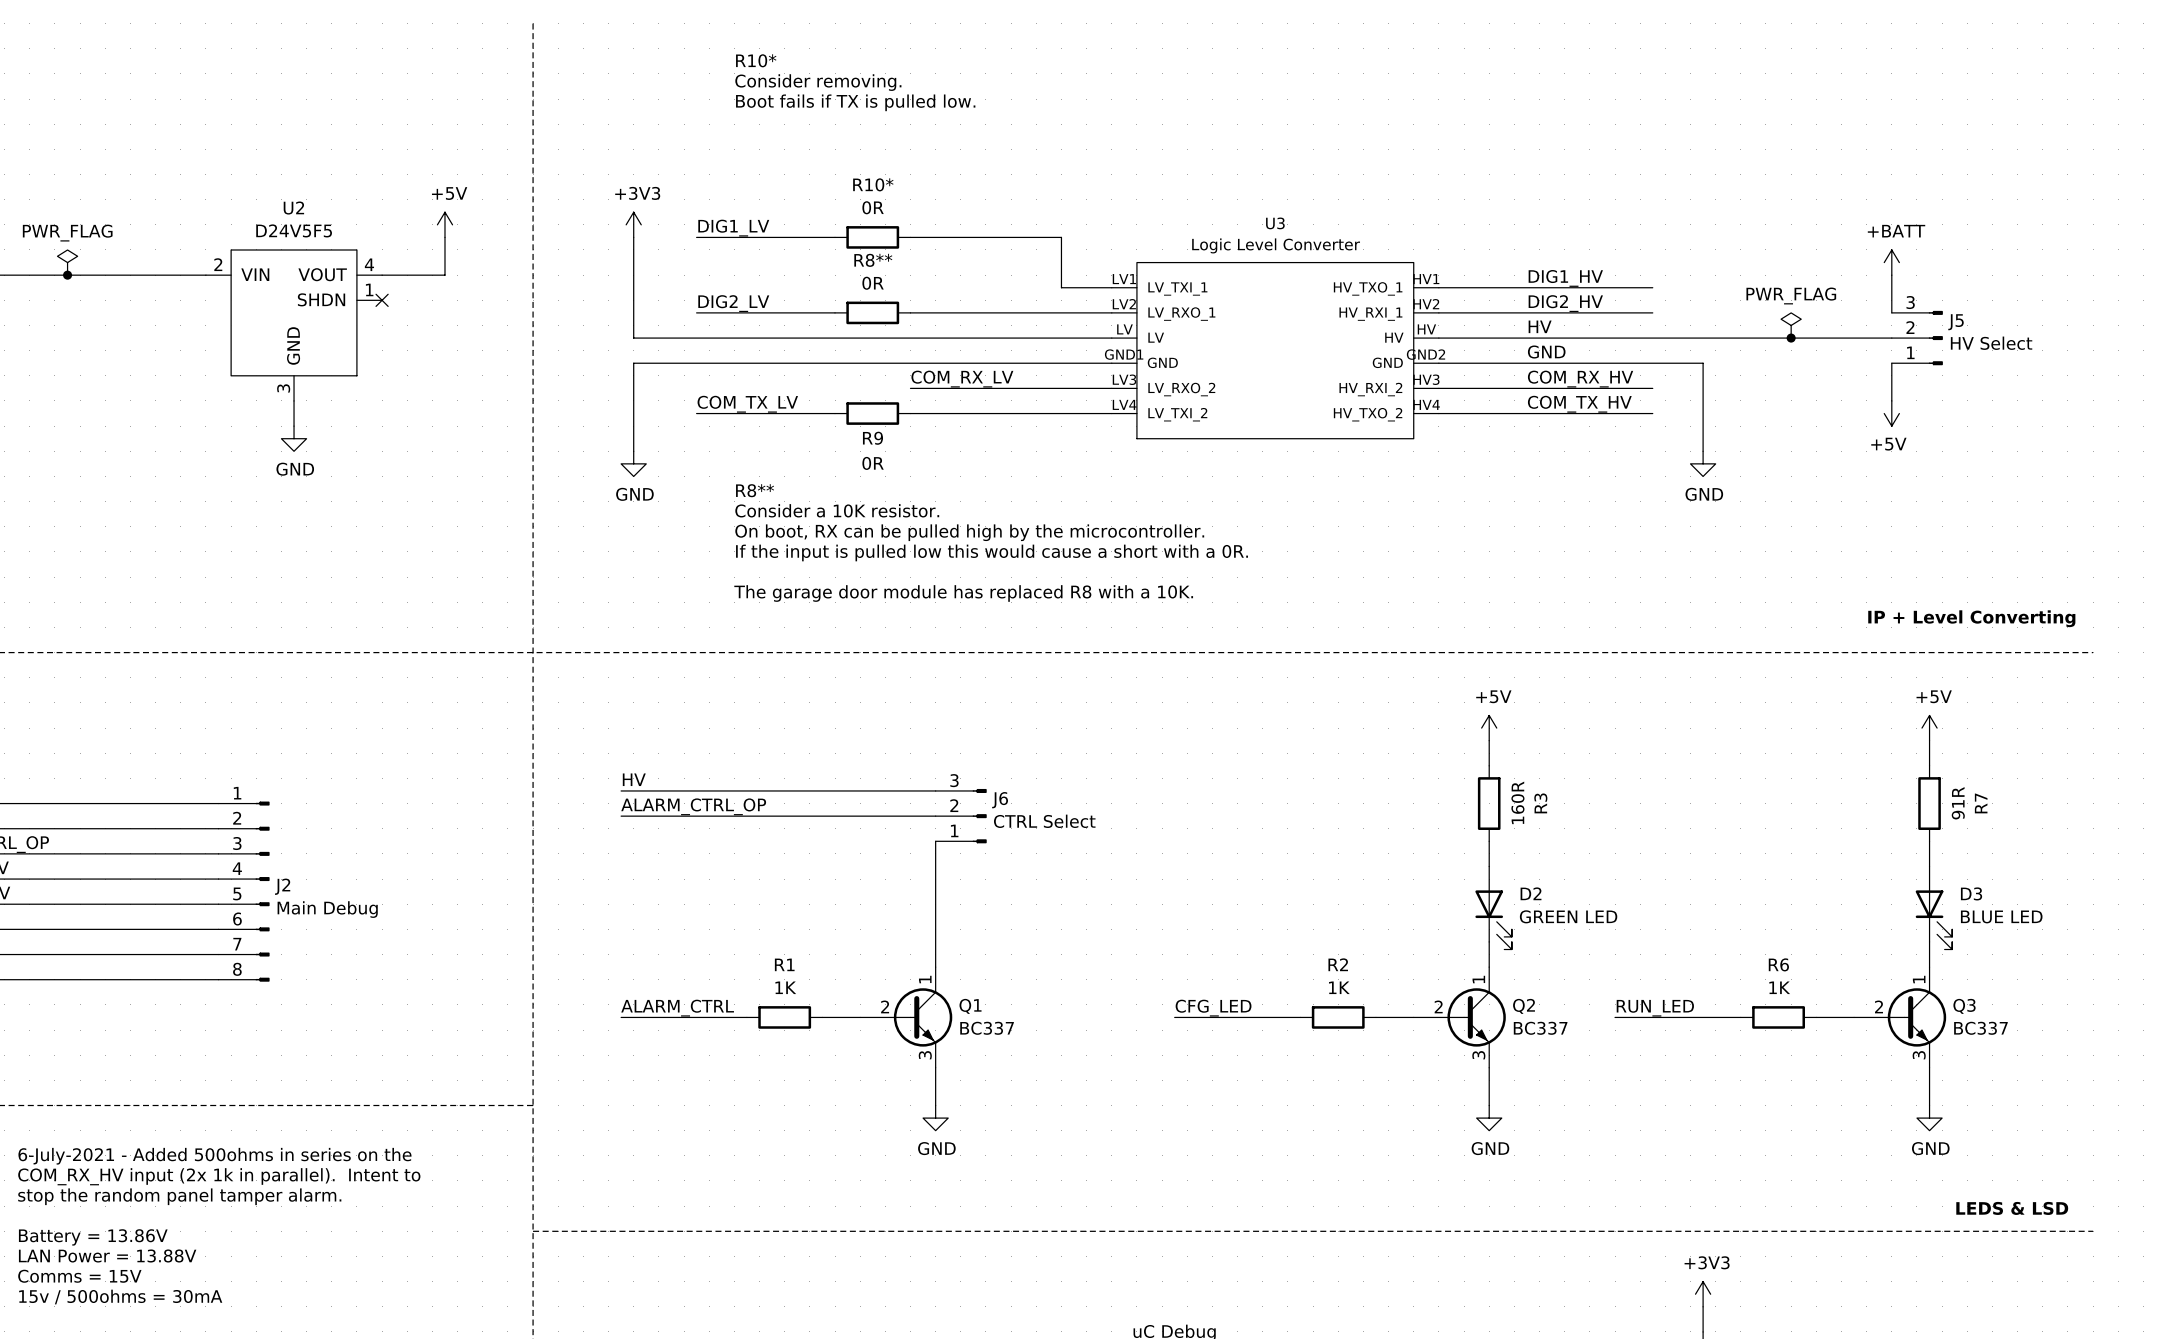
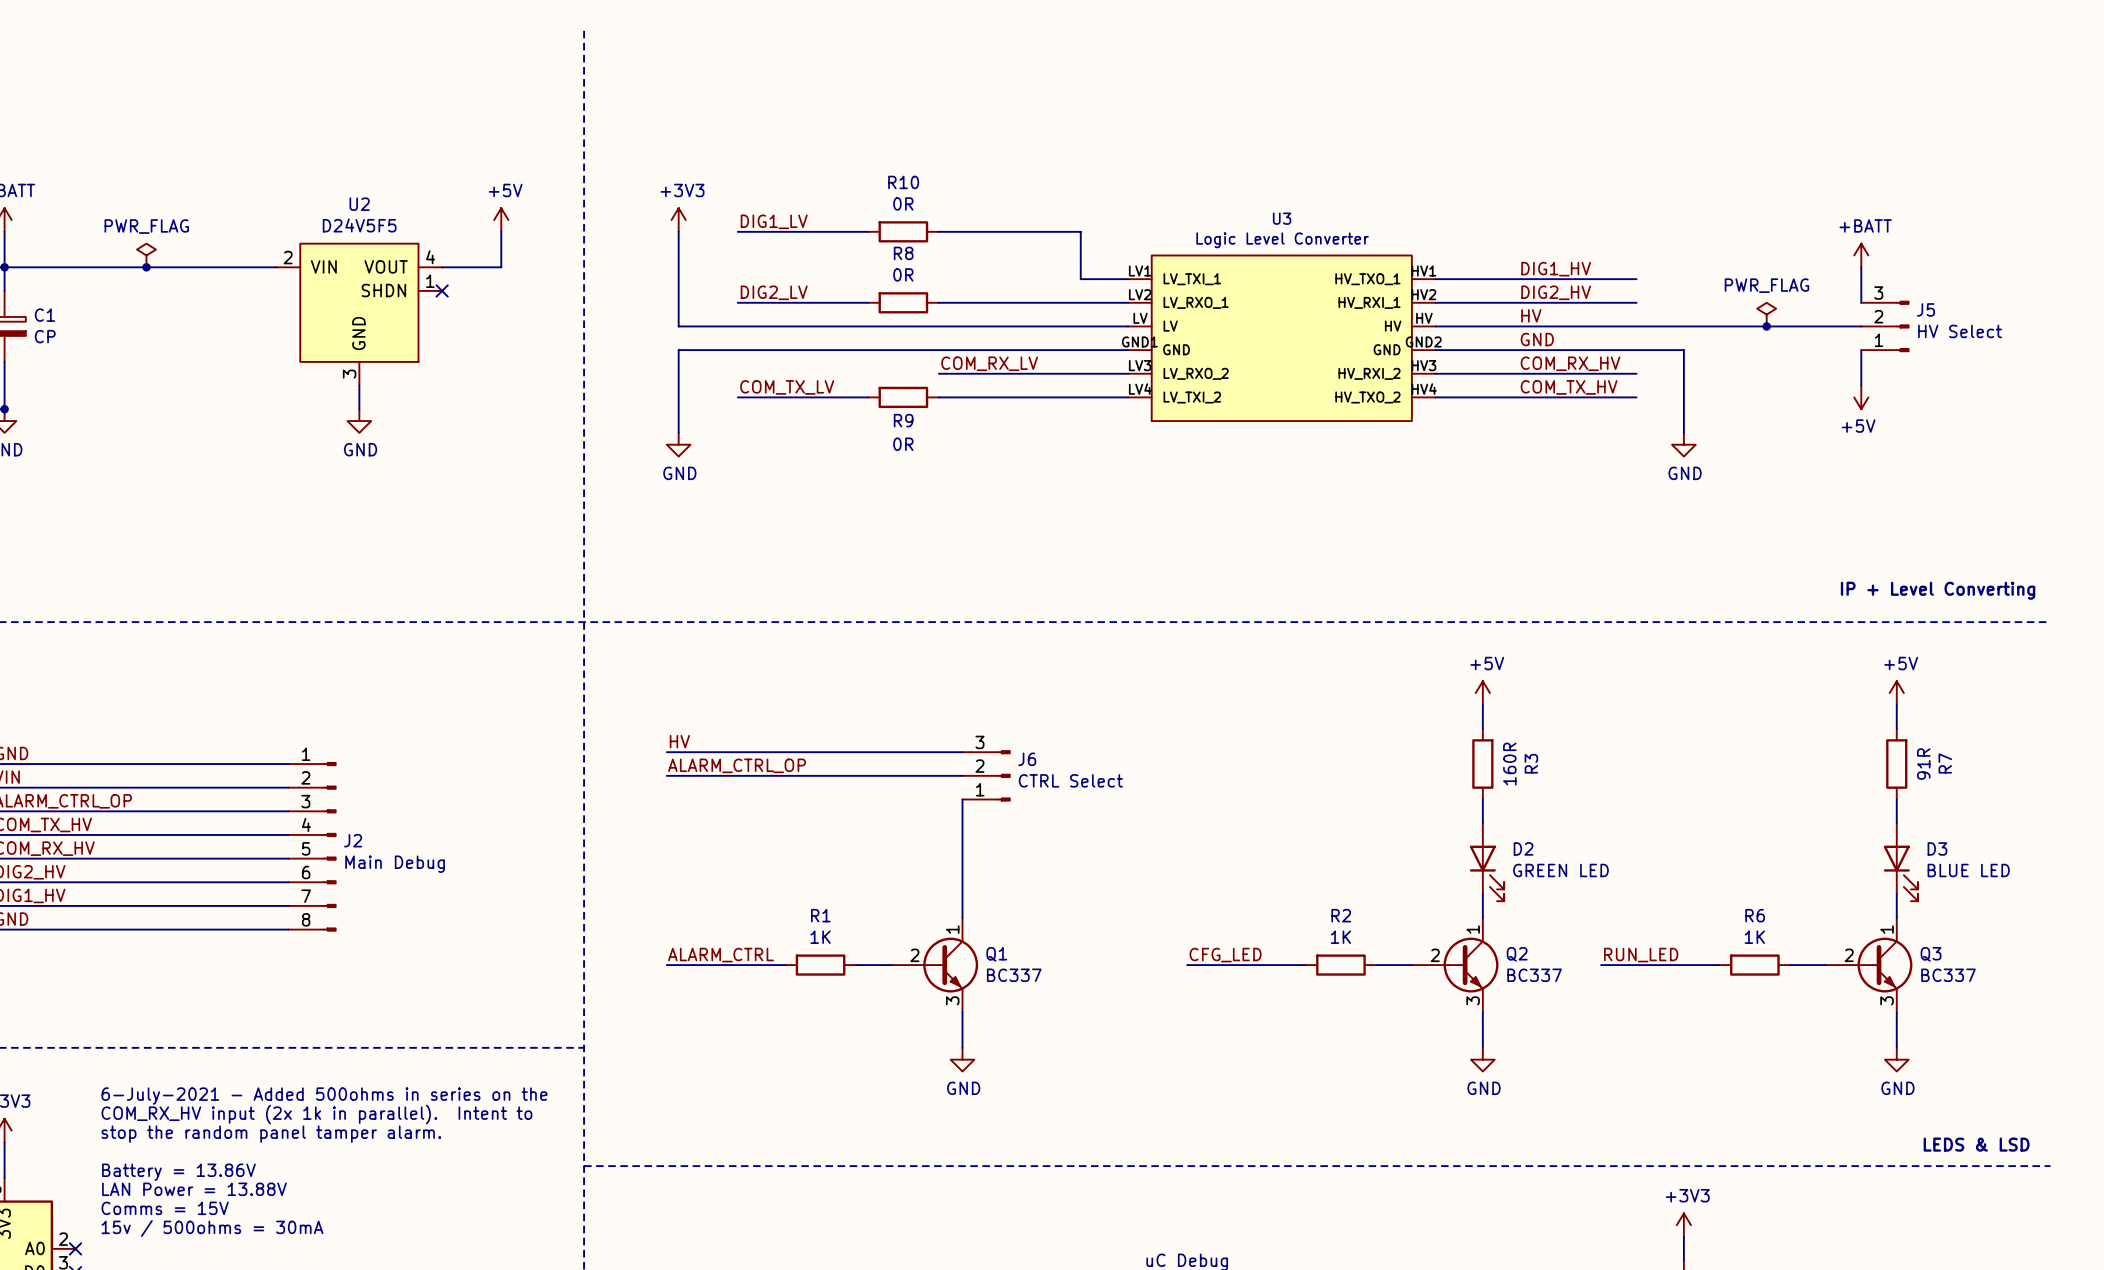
text: R10* (756, 60) -> none
text: Consider removing. (818, 82) -> none
text: Boot fails if TX is pulled low. (855, 102) -> none
R10* name: R10* (873, 184) -> R10 (903, 182)
R8** name: R8** (873, 260) -> R8 (903, 253)
text: R8** (755, 490) -> none
text: Consider a 10K resistor. (837, 510) -> none
text: On boot, RX can be pulled high by the microcontroller. (969, 532) -> none
text: If the input is pulled low this would cause a short with a 0R. (992, 552) -> none
text: The garage door module has replaced R8 with a 10K. (963, 593) -> none

